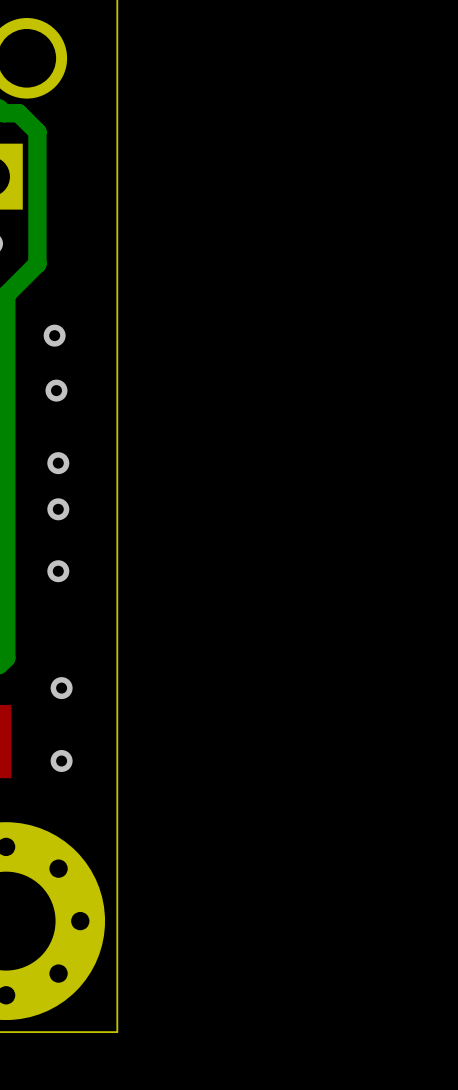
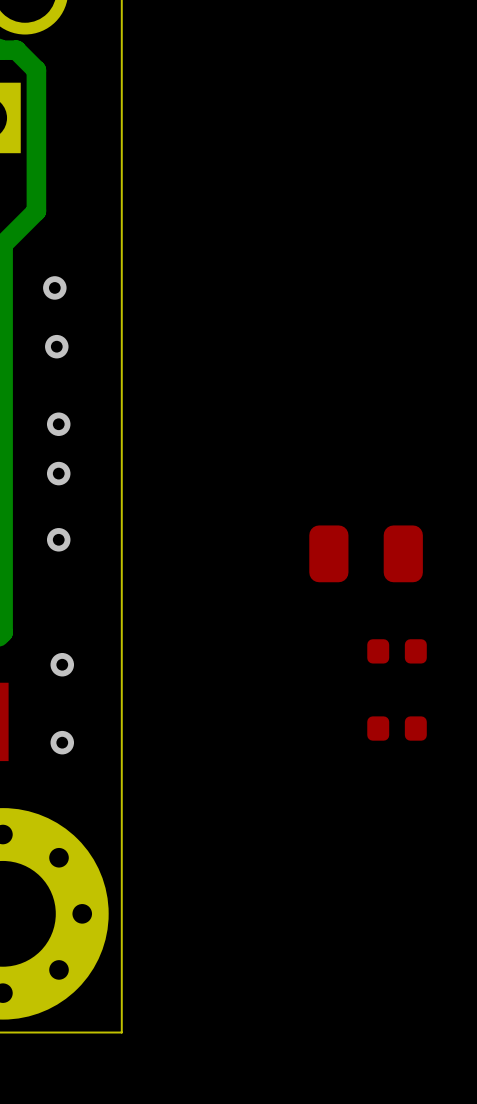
part: none -> (366, 553)
part: none -> (397, 651)
part: none -> (397, 728)

